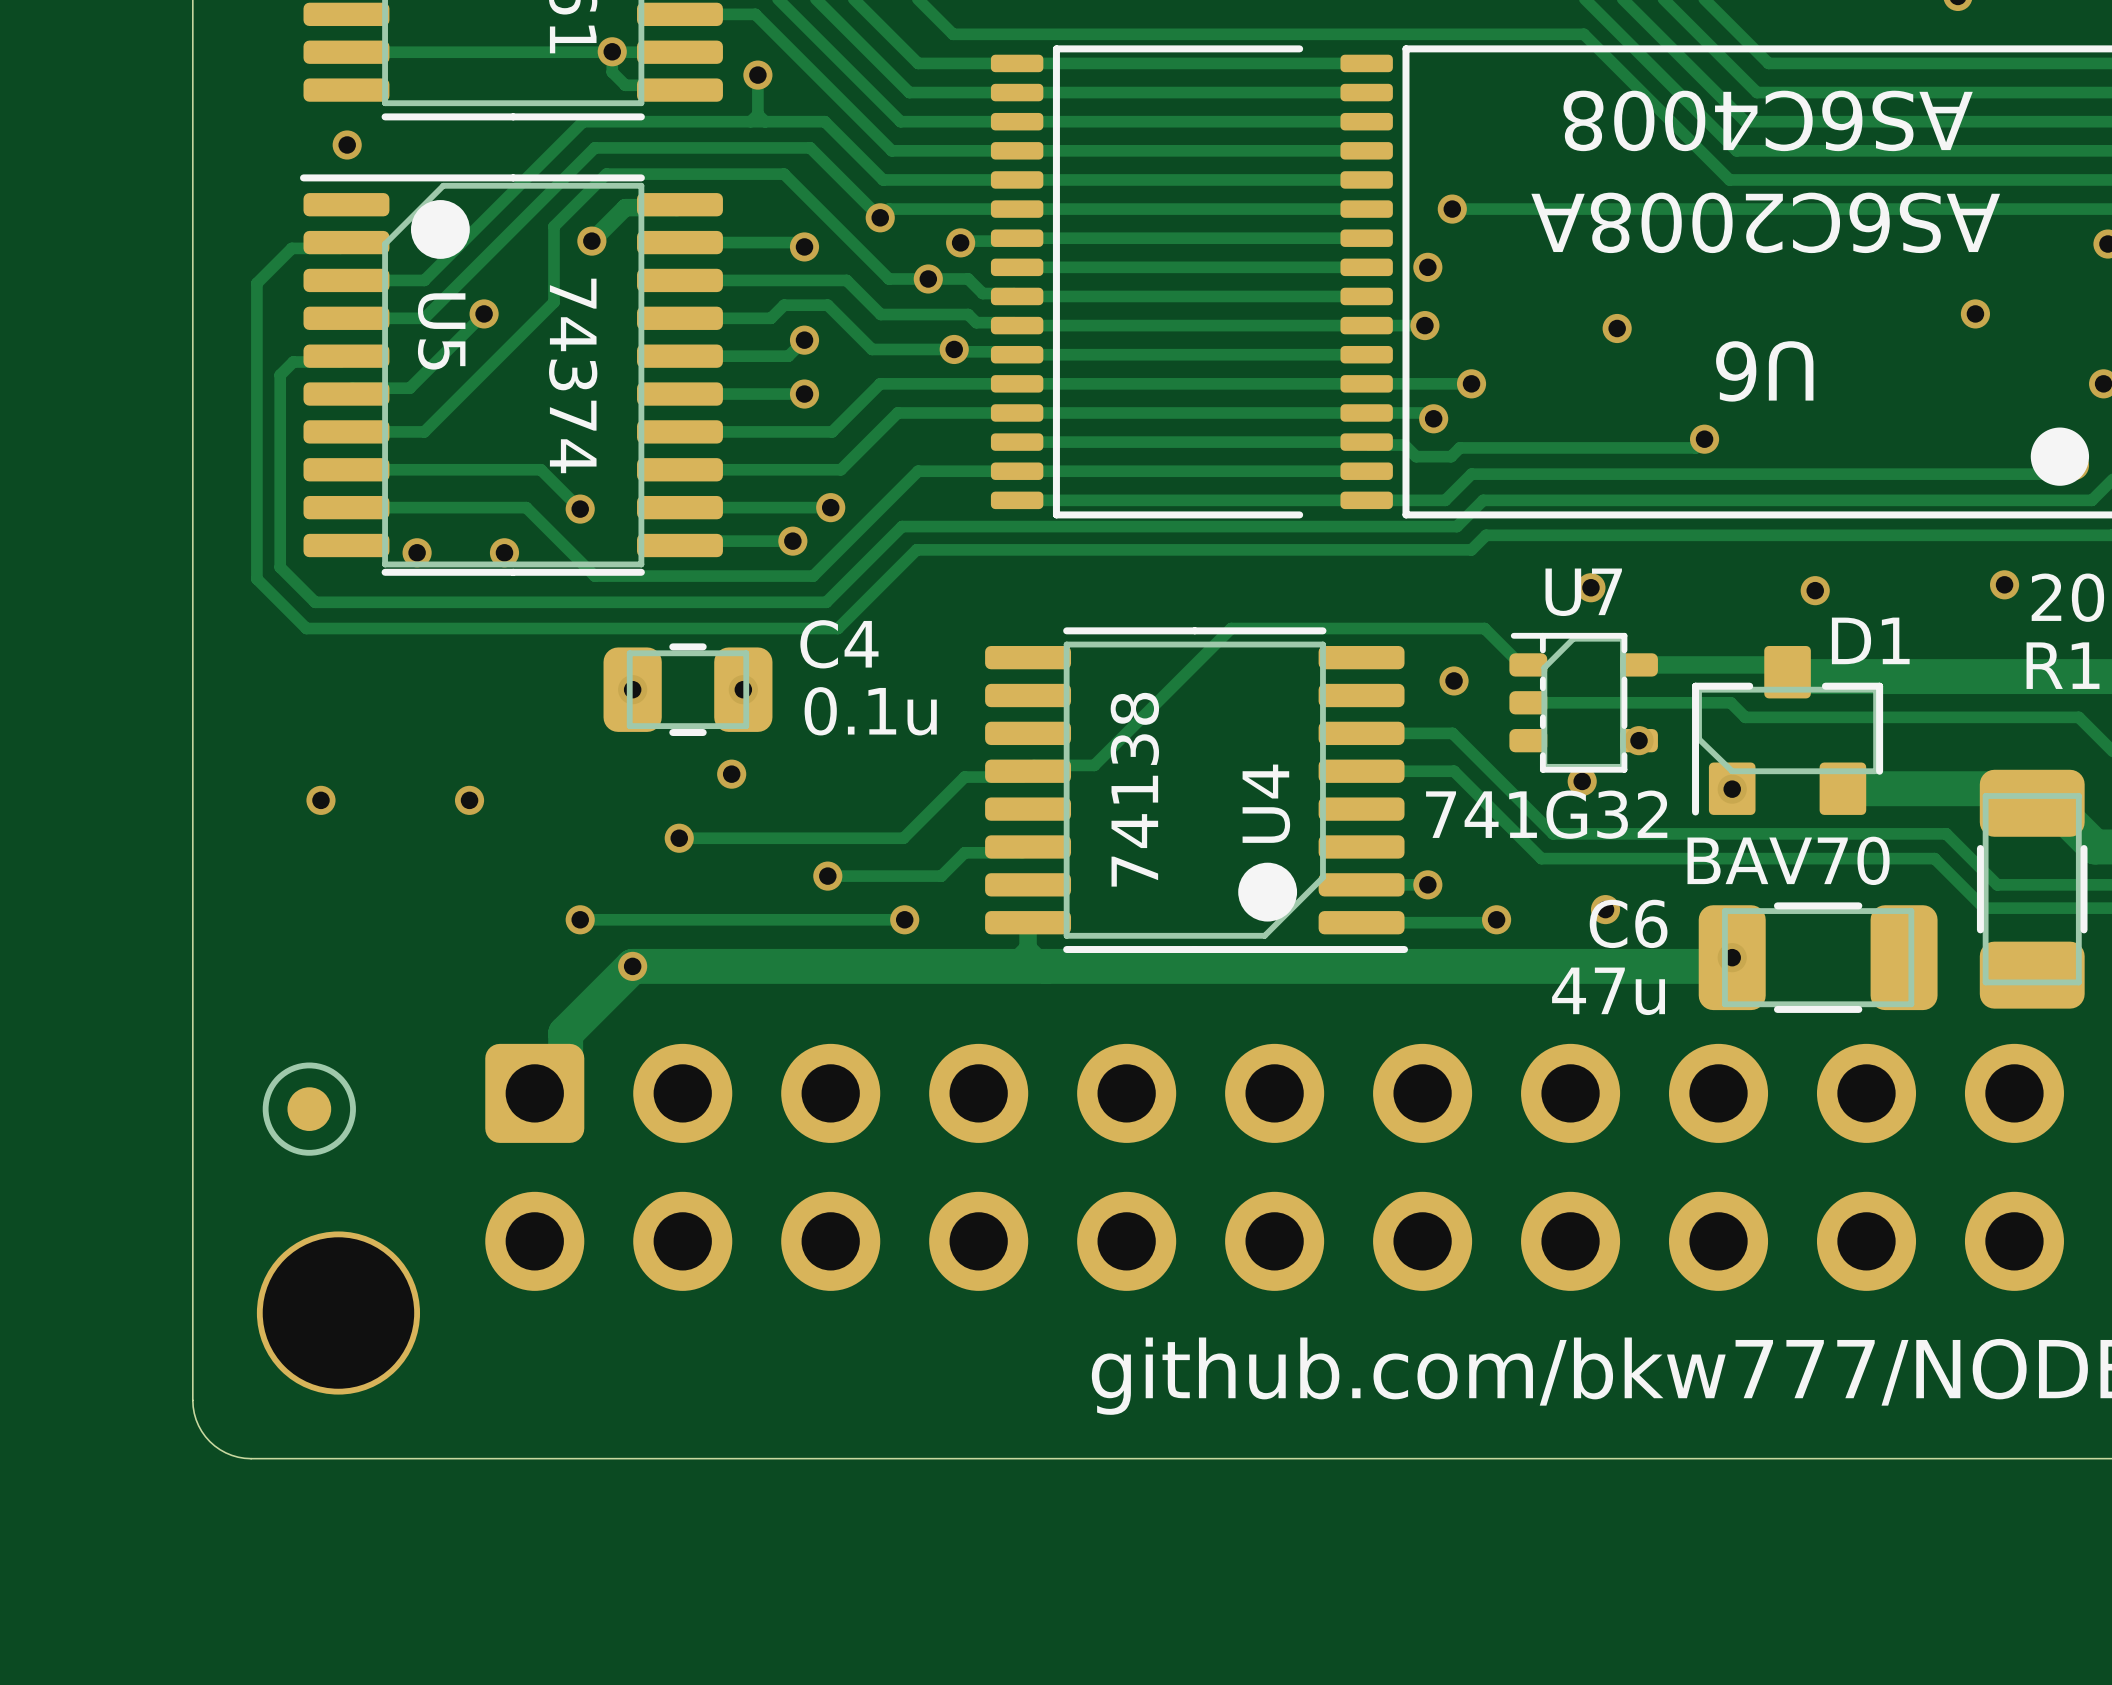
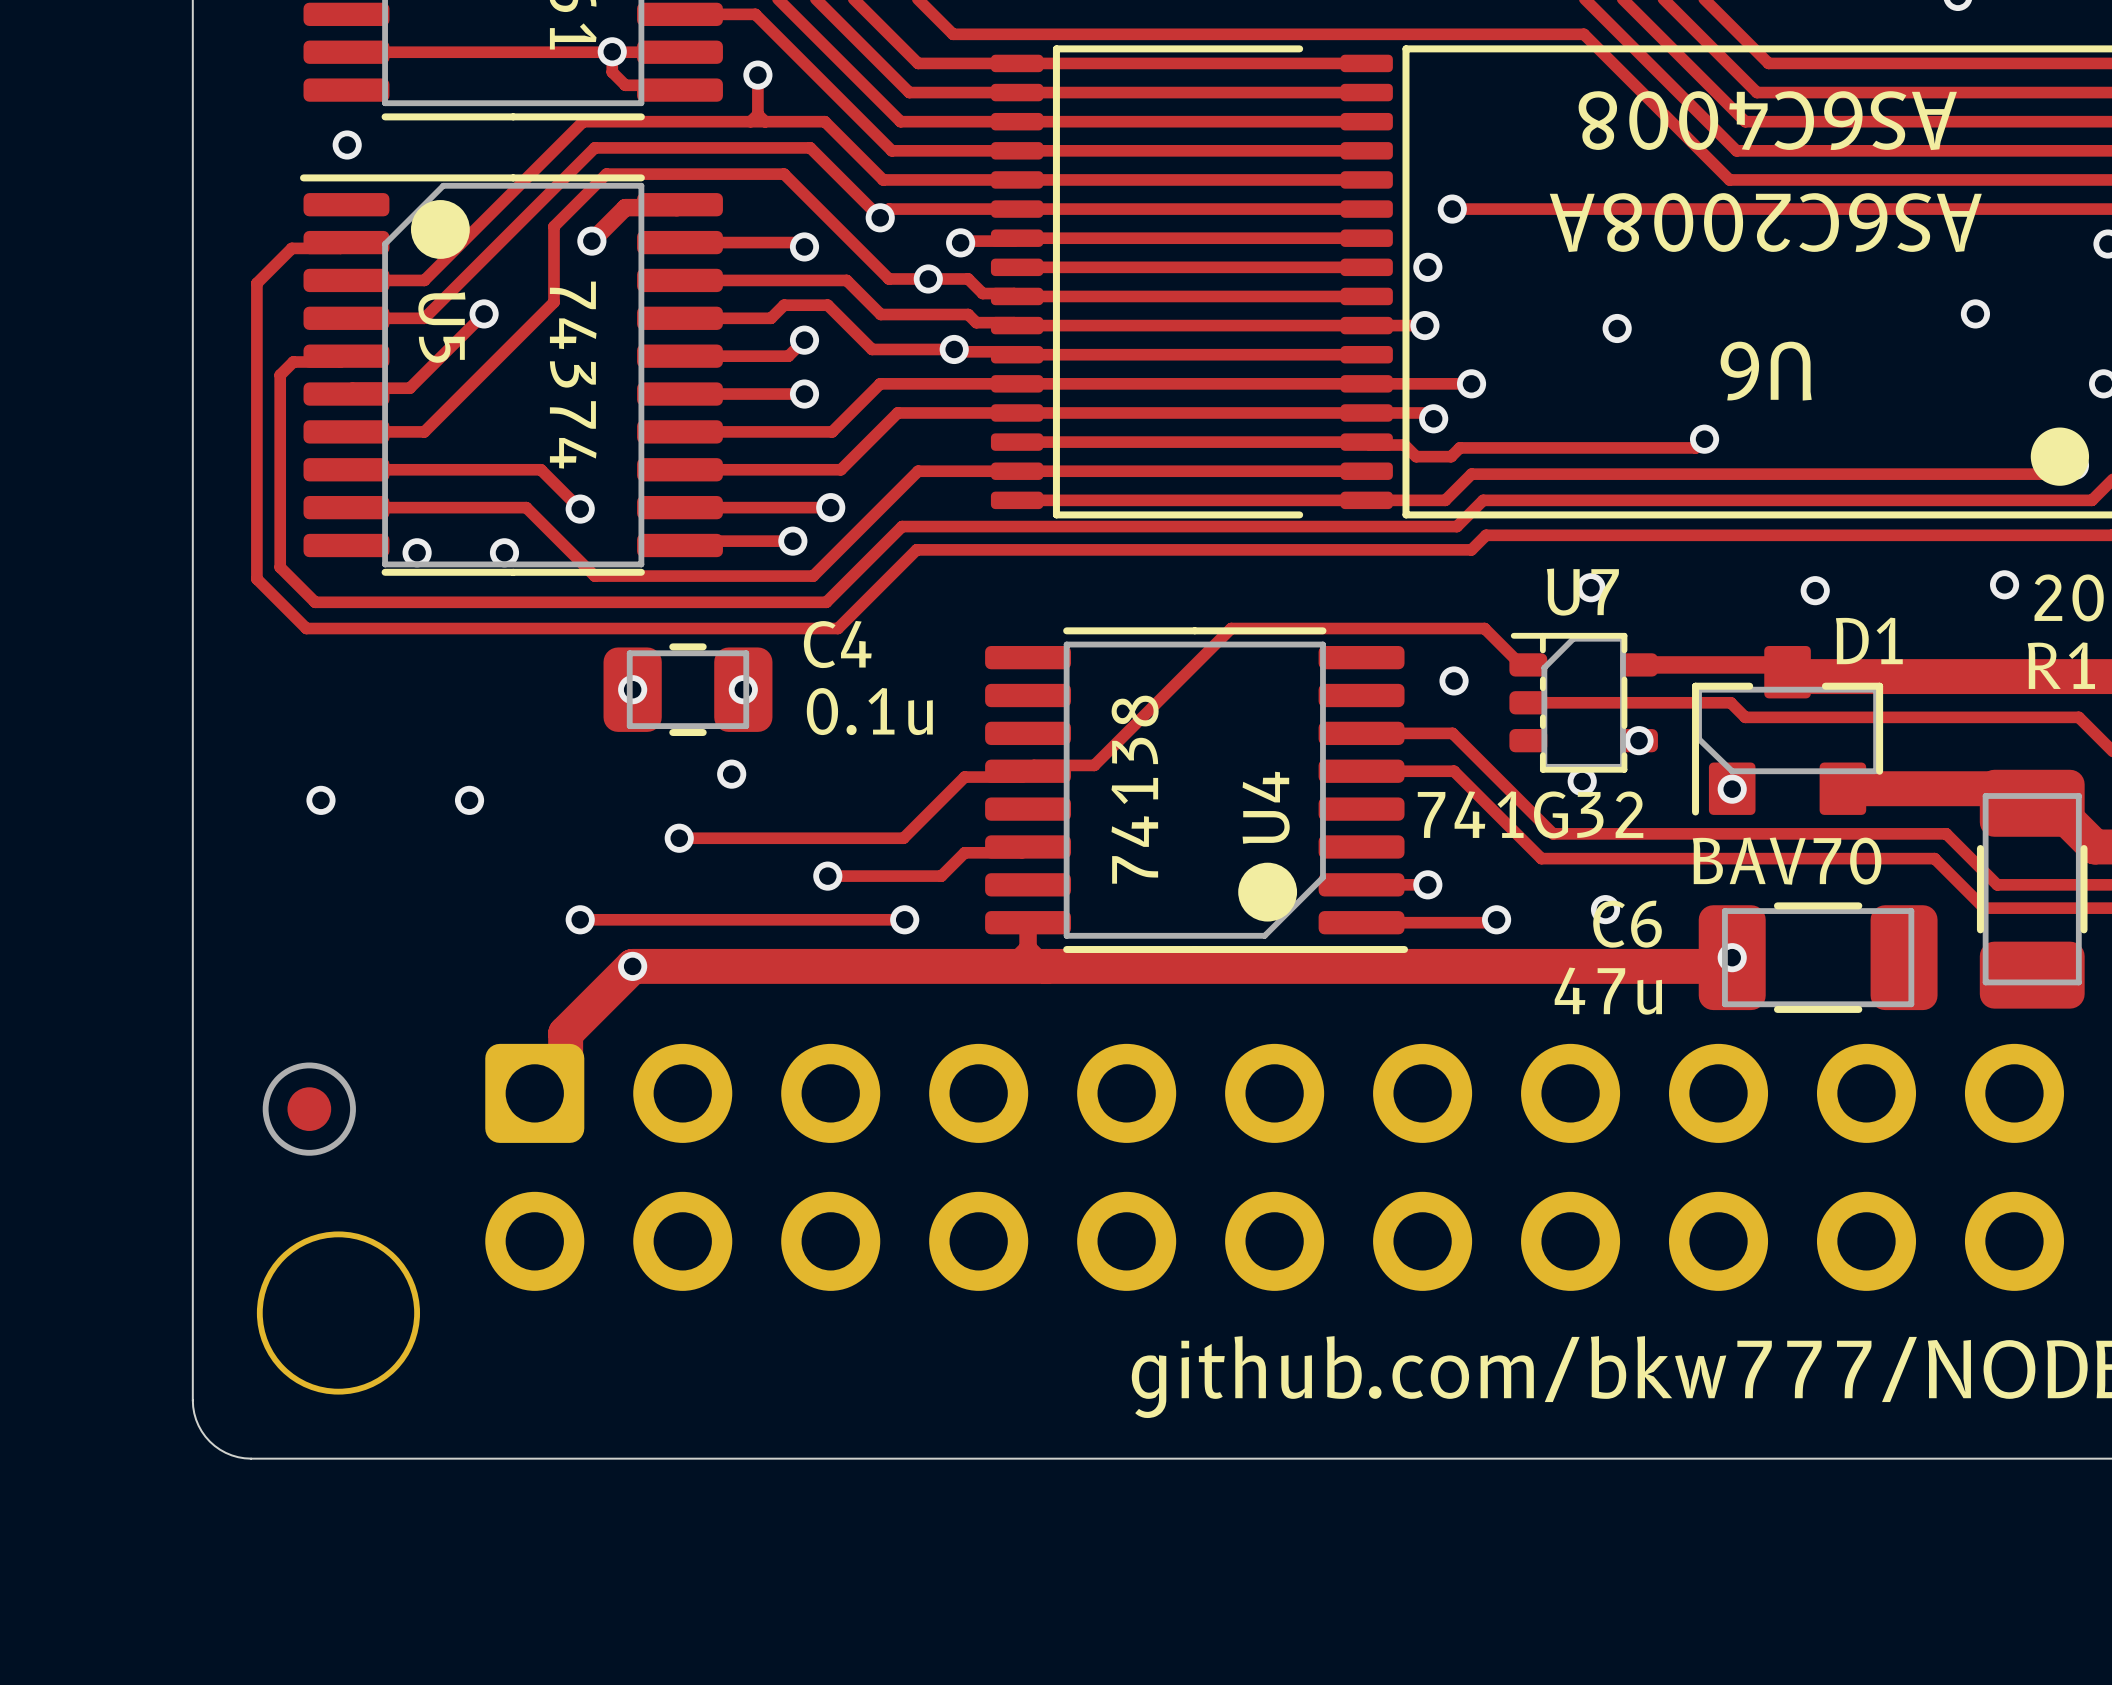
U7 value position: 741G32 (1546, 814) -> 741G32 (1530, 814)

